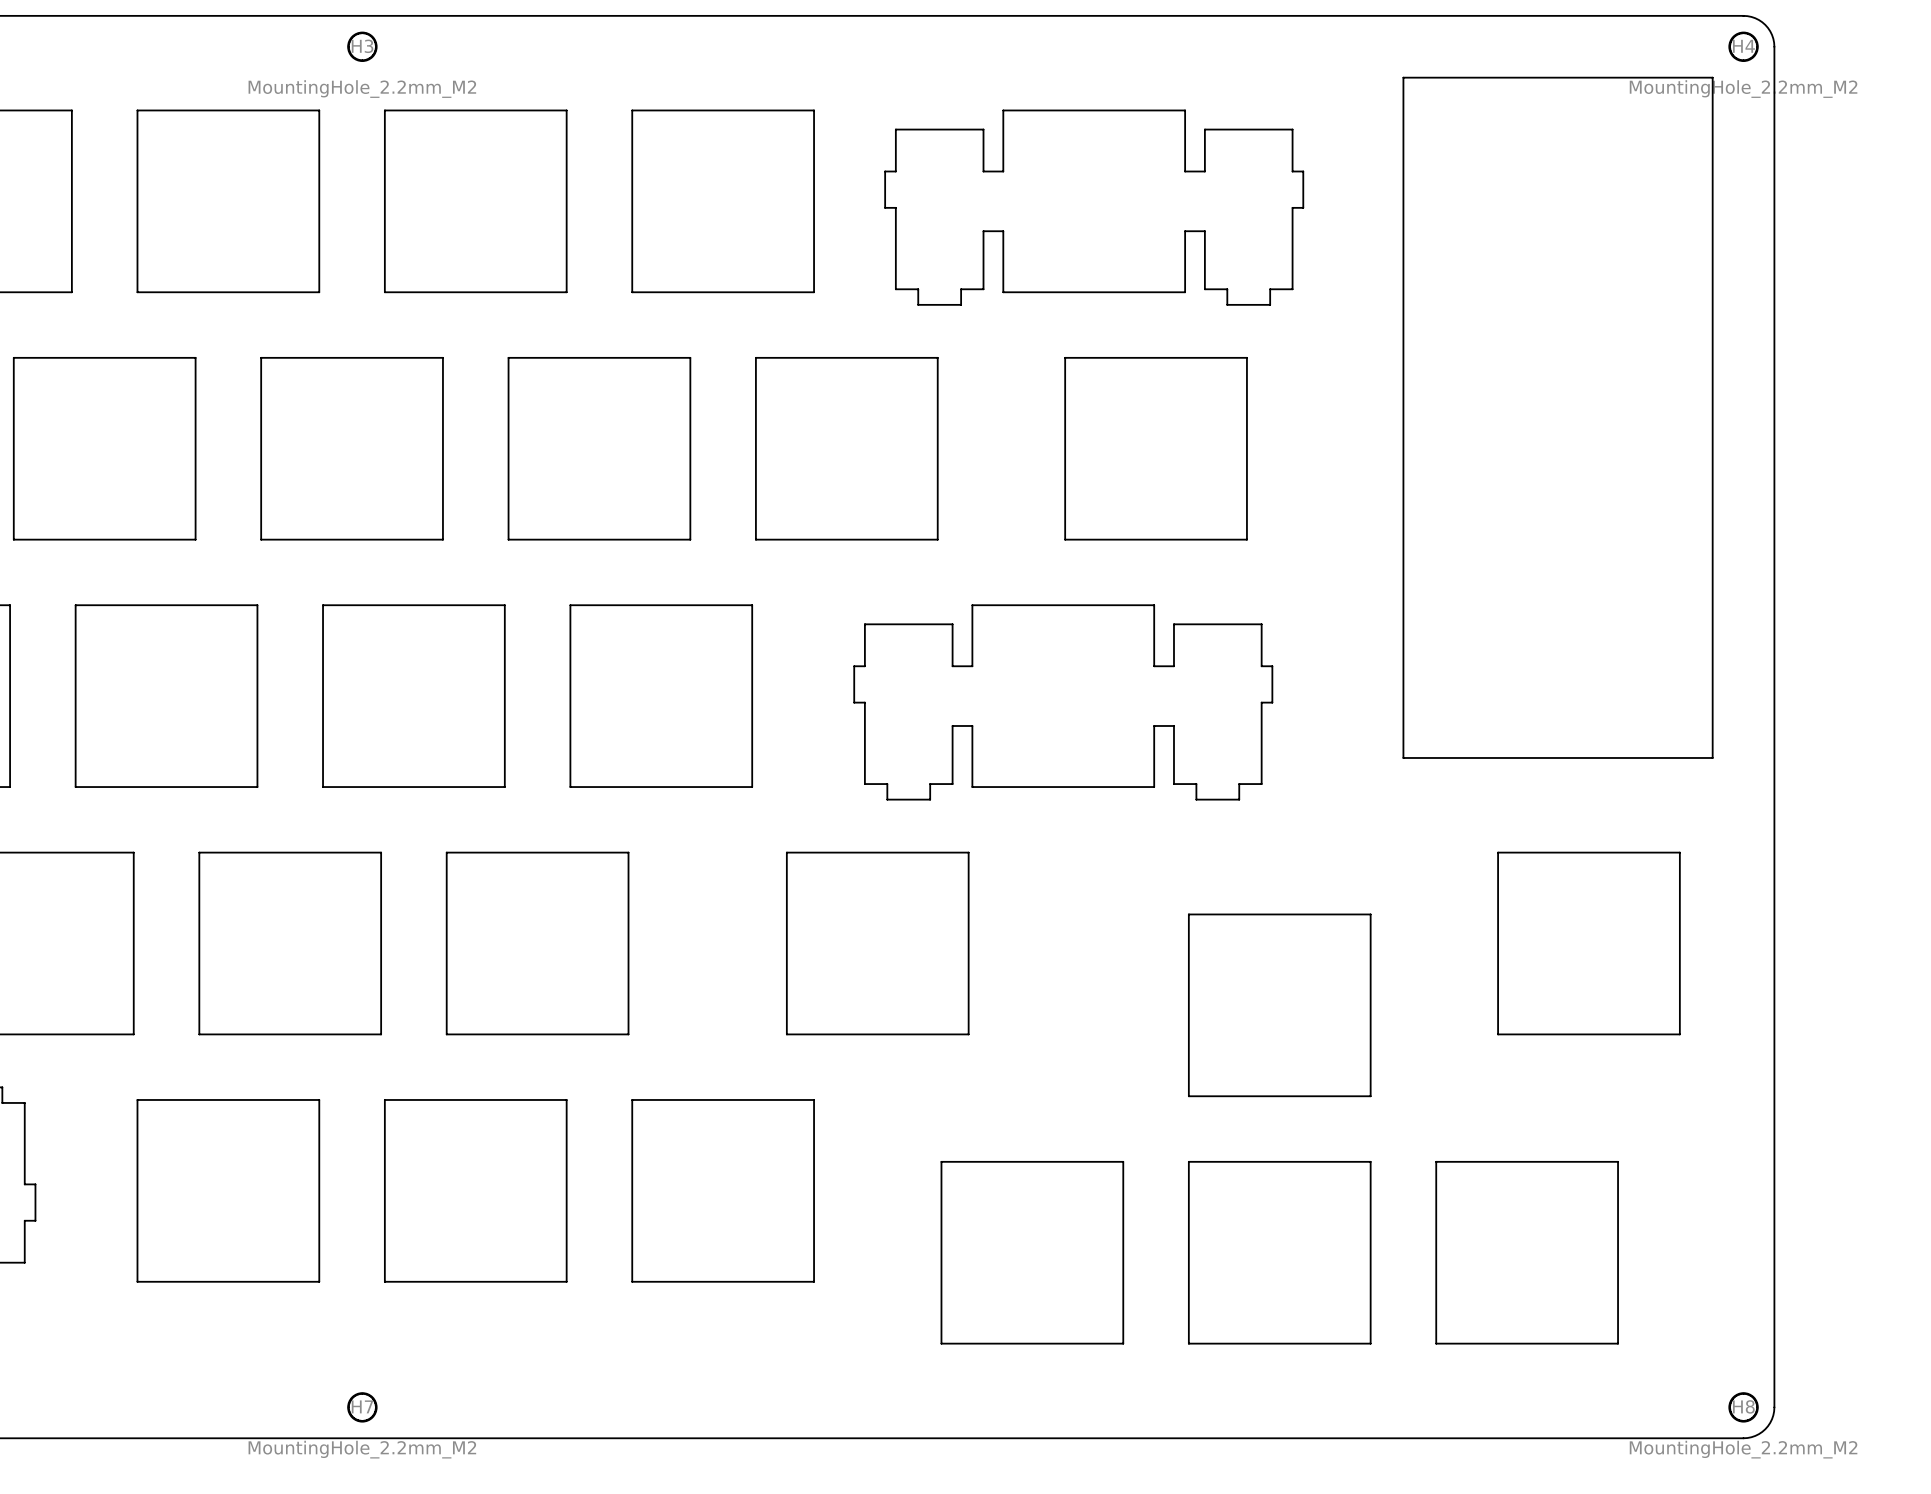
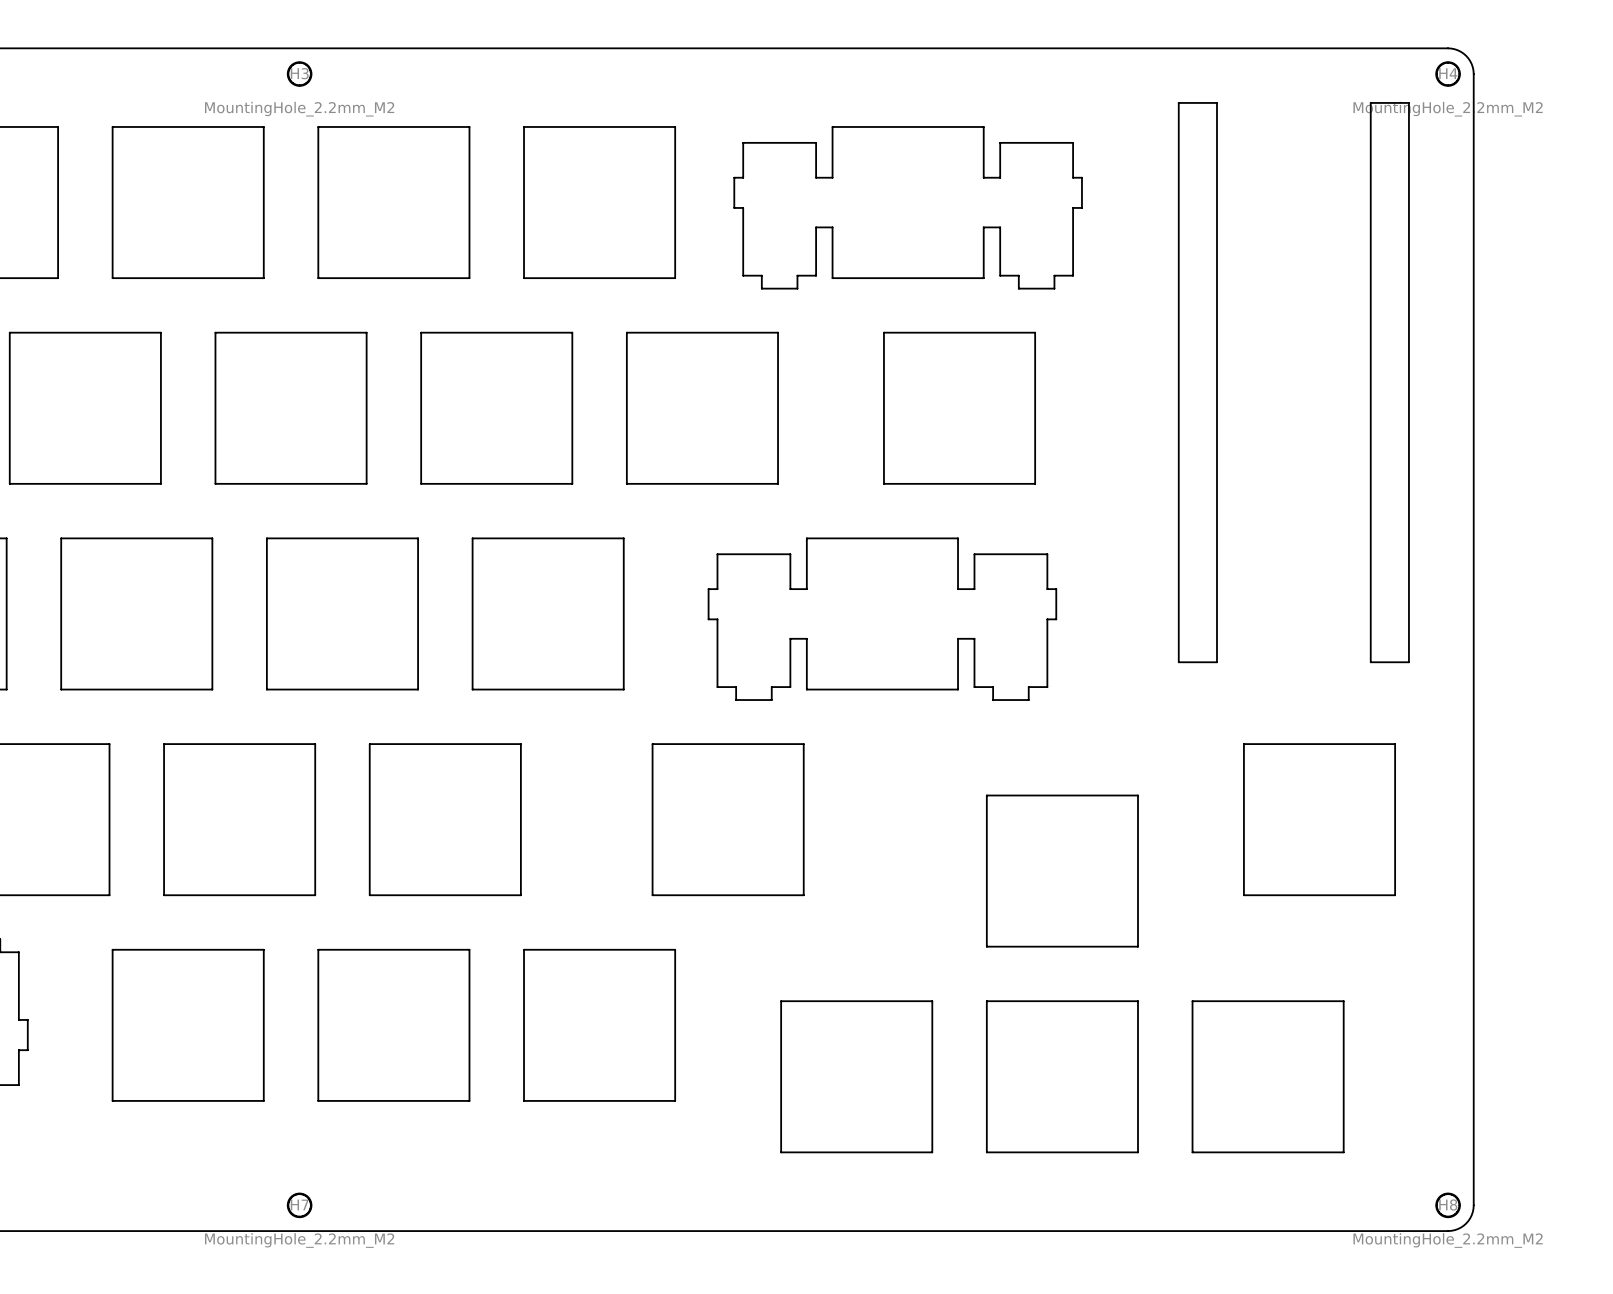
board edge: (1403, 77) (1403, 757) (1712, 757) (1712, 77) (1403, 77) -> none
board edge: none -> (1178, 102) (1216, 102) (1216, 662) (1178, 662) (1178, 102)
board edge: none -> (1370, 102) (1408, 102) (1408, 662) (1370, 662) (1370, 102)

